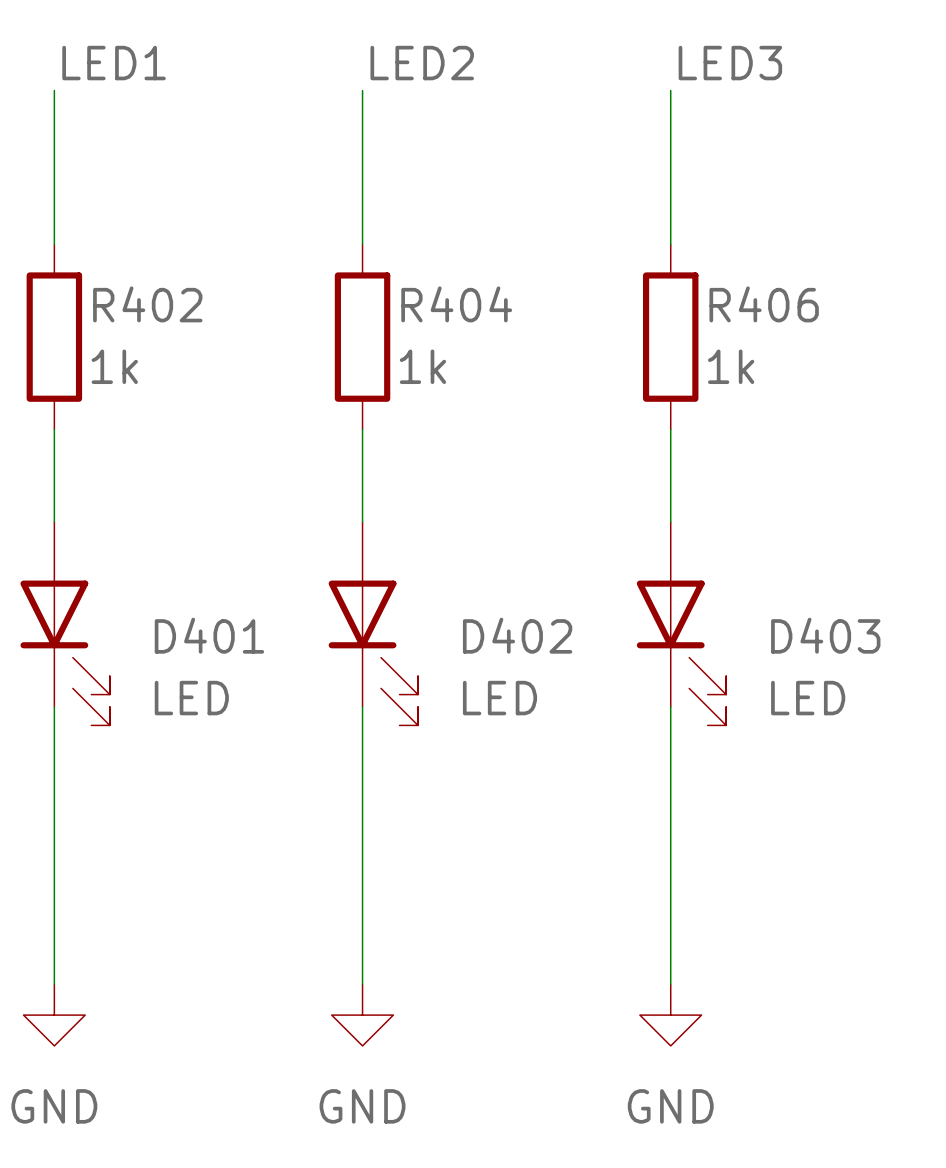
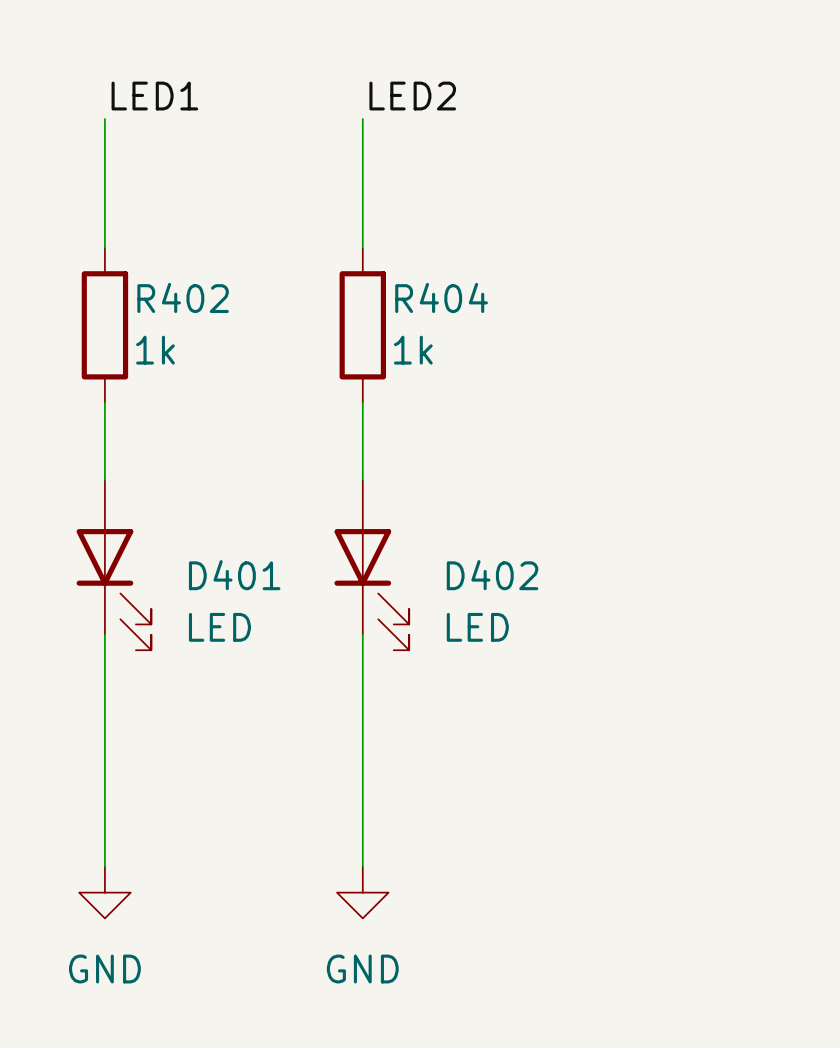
label: LED3 (730, 63) -> none
wire: (670, 90) (670, 244) -> none
R406: 1k (670, 337) -> none
wire: (670, 429) (670, 522) -> none
D403: LED (681, 623) -> none
wire: (670, 706) (670, 984) -> none
power symbol: GND (670, 1015) -> none

